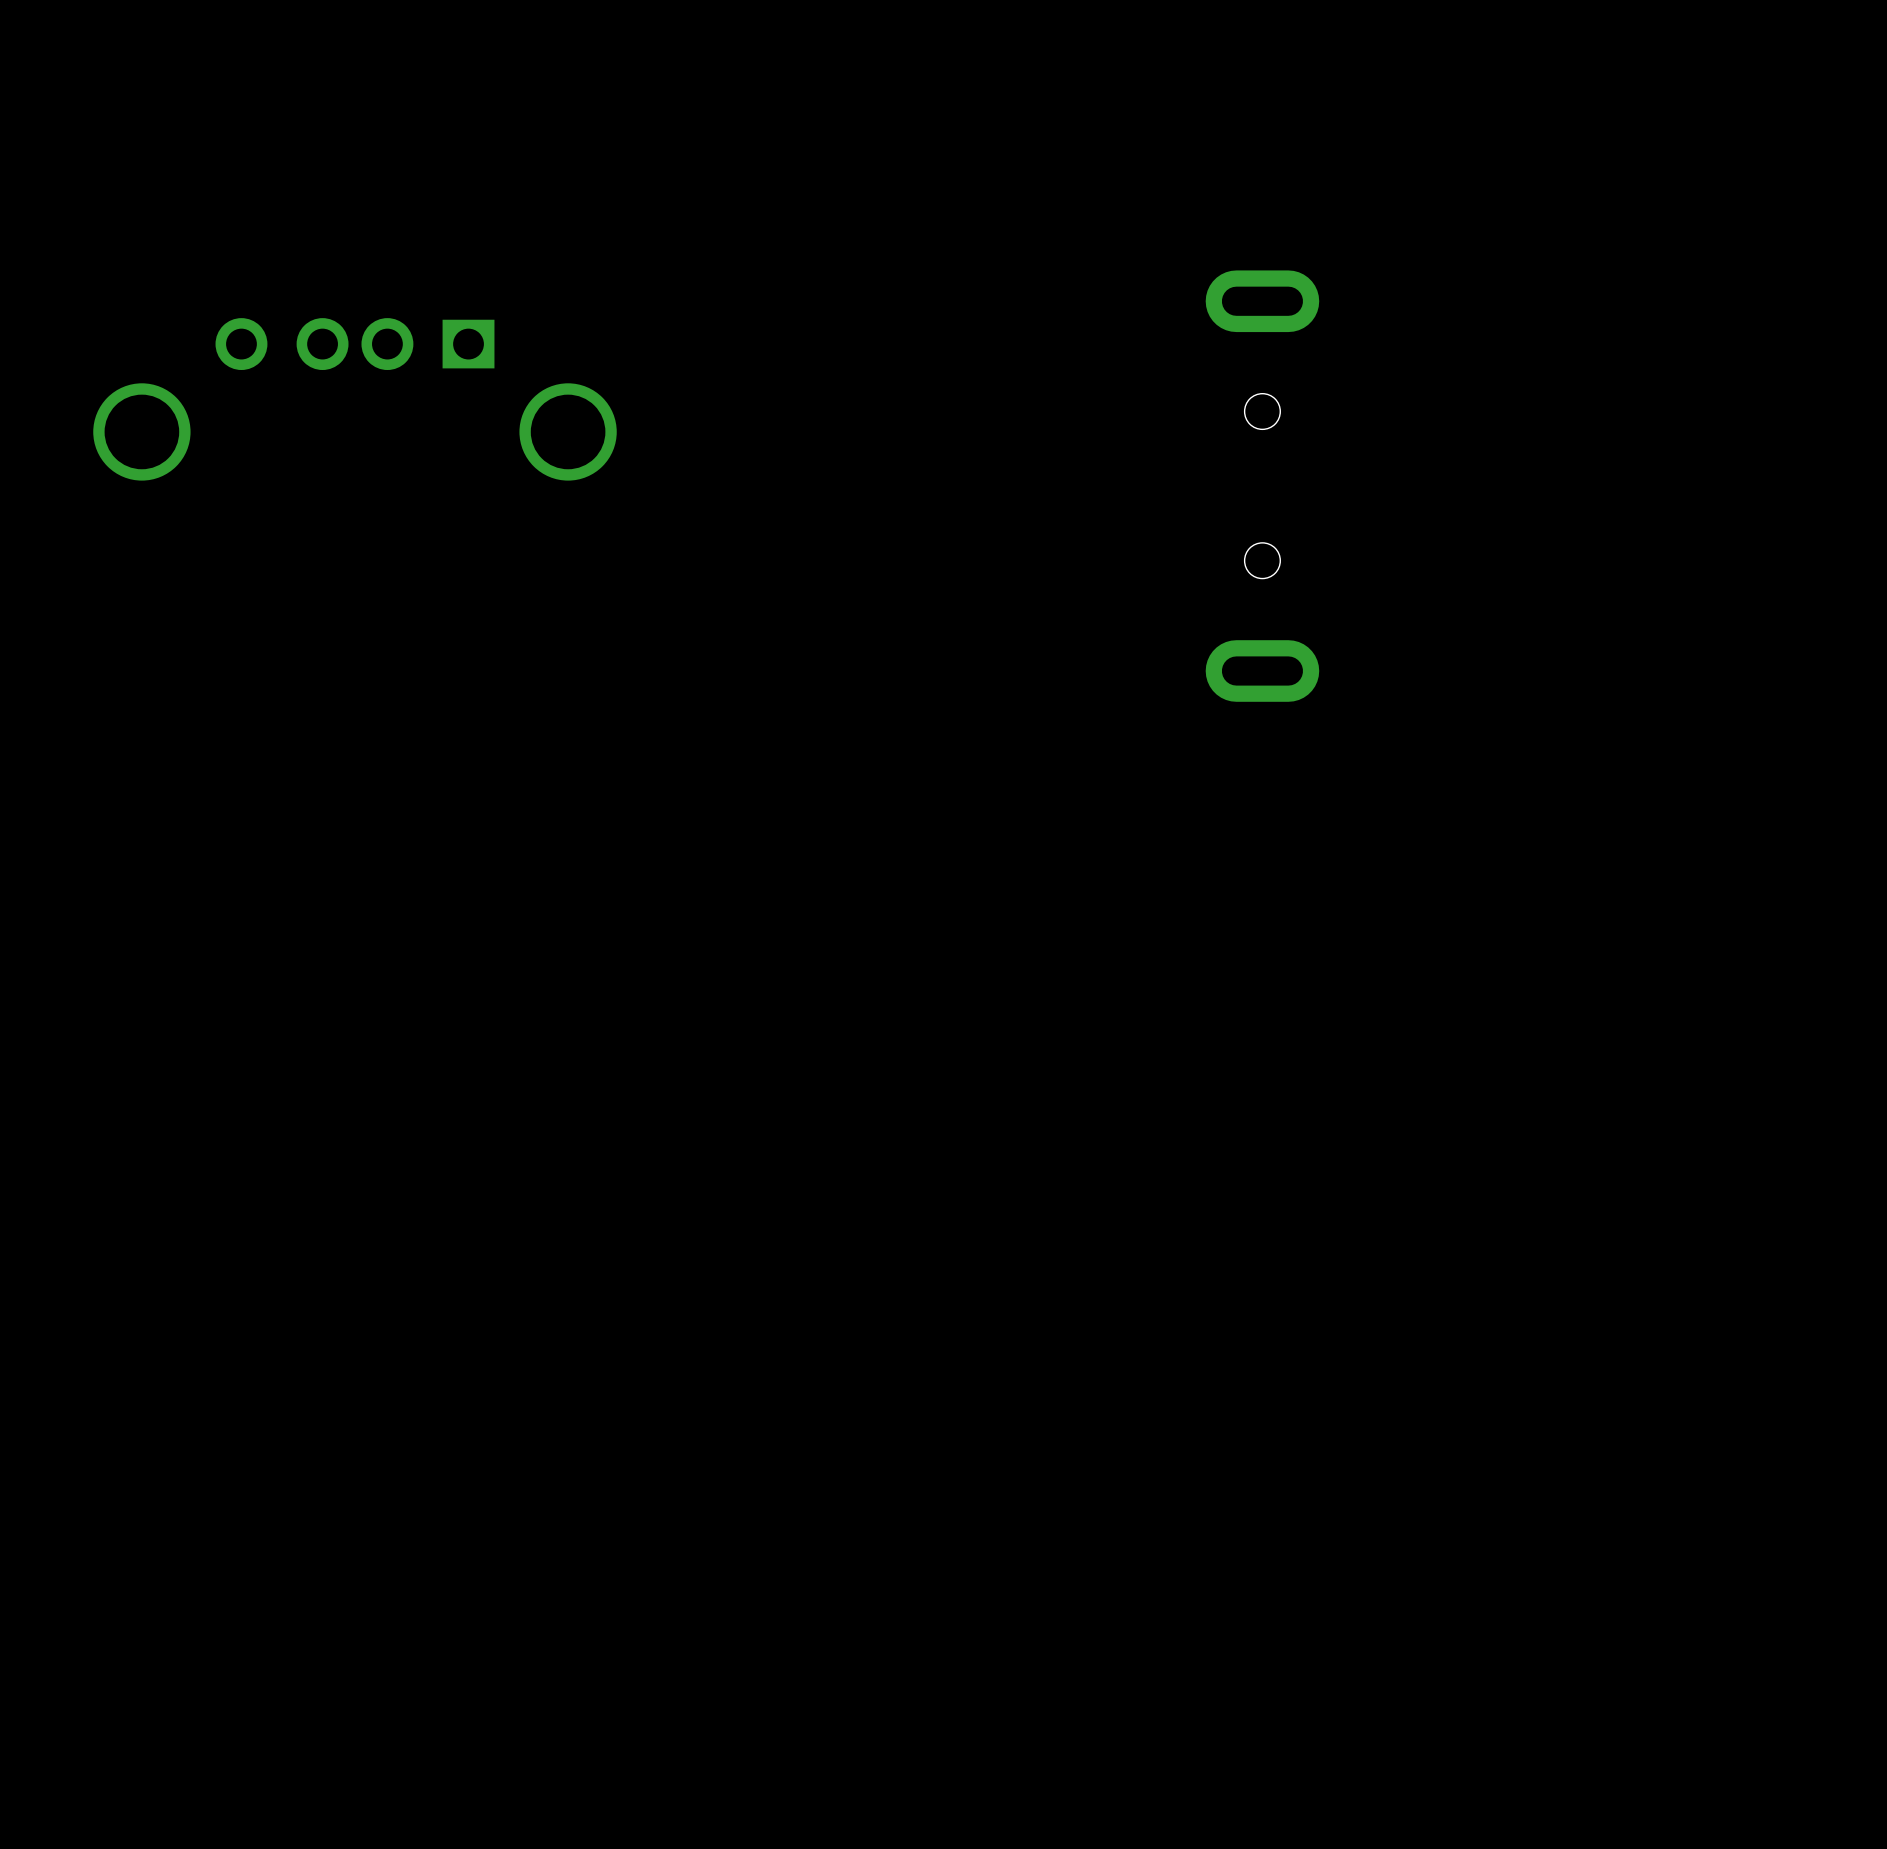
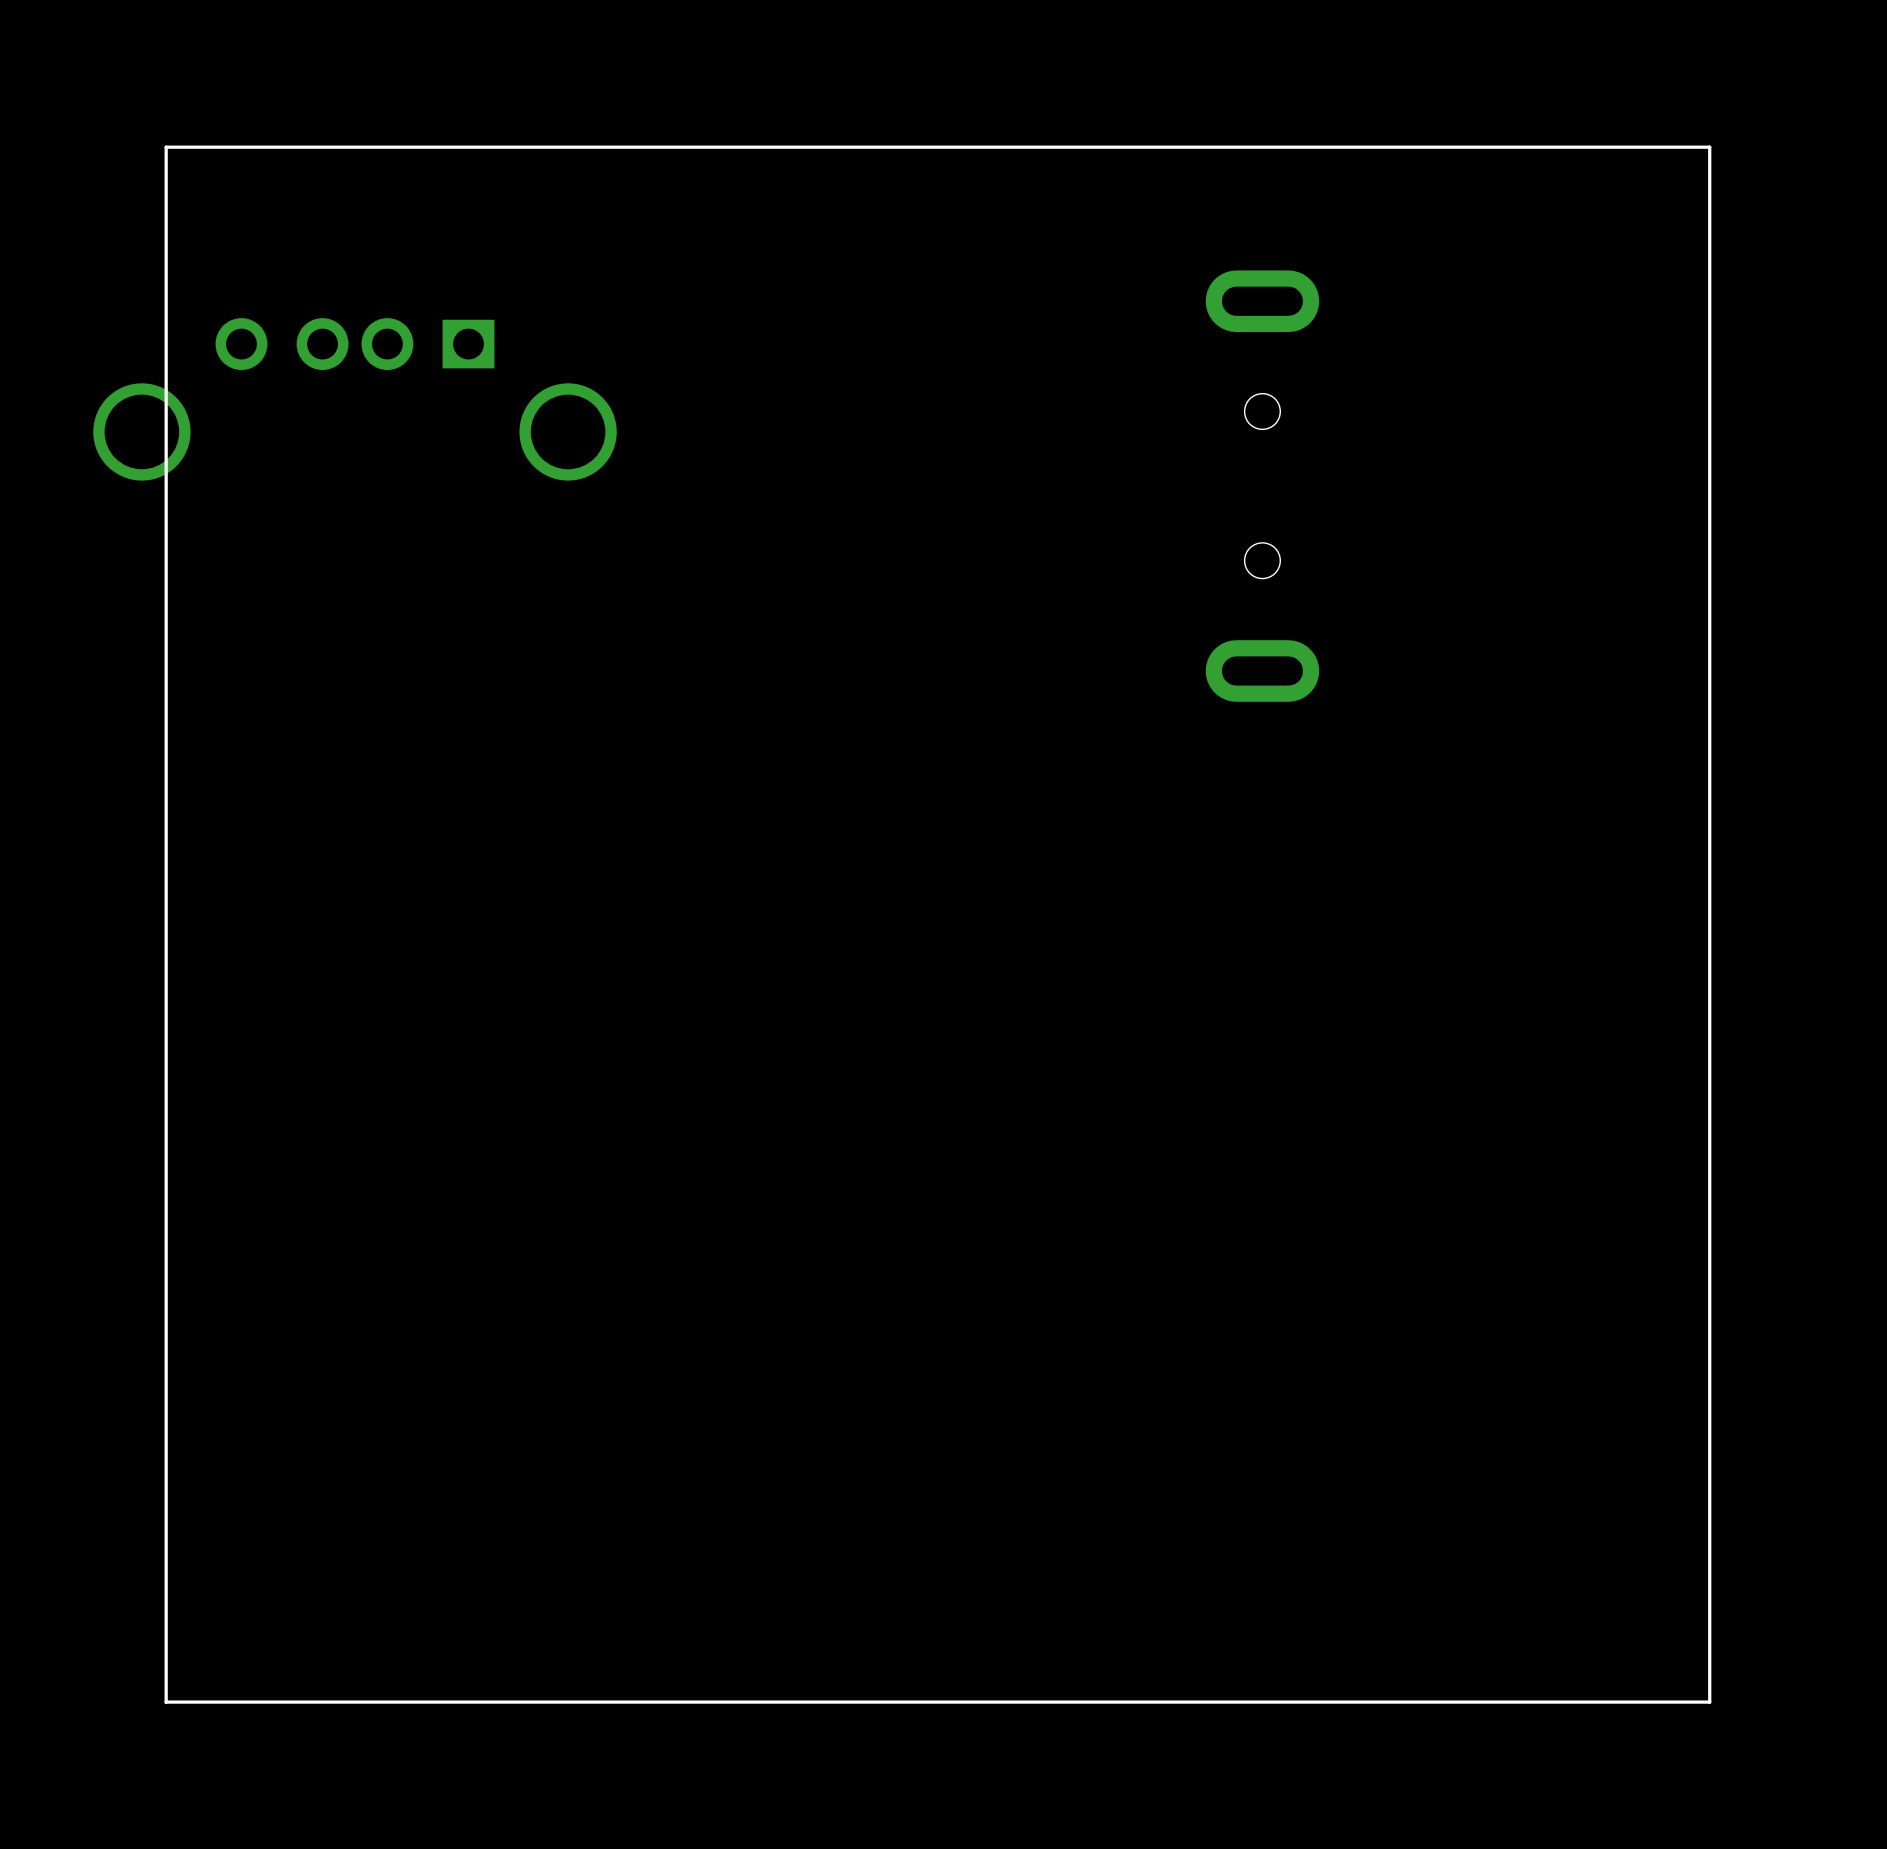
board edge: none -> (1709, 147) (166, 147) (166, 1702) (1709, 1702) (1709, 147)

